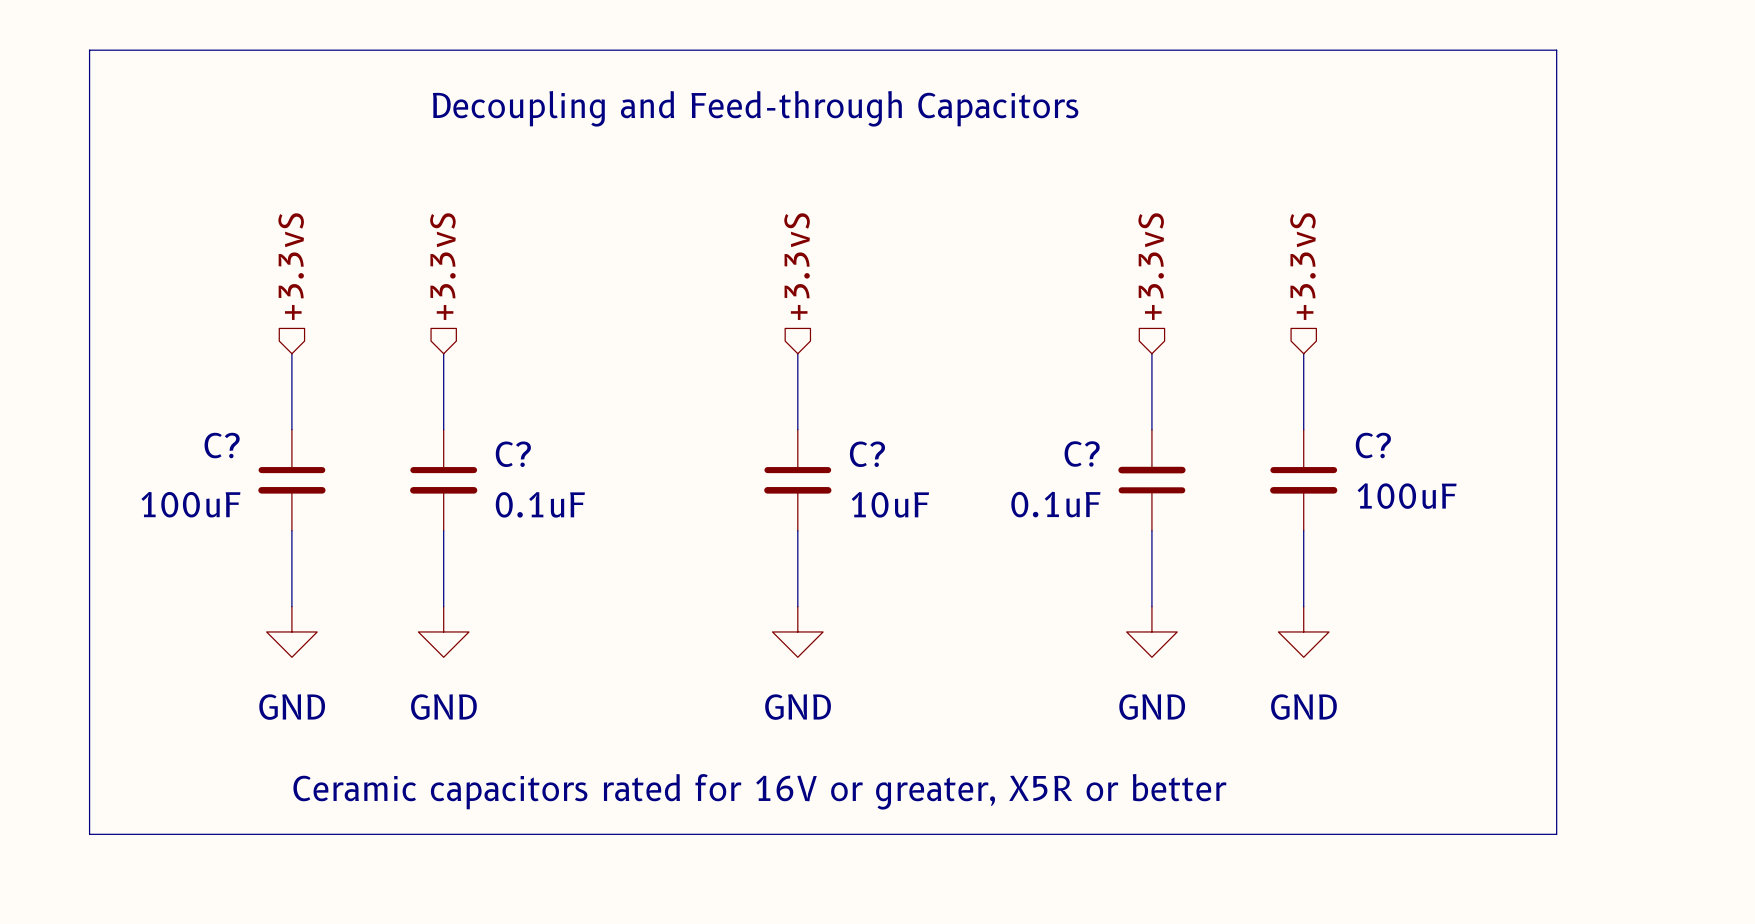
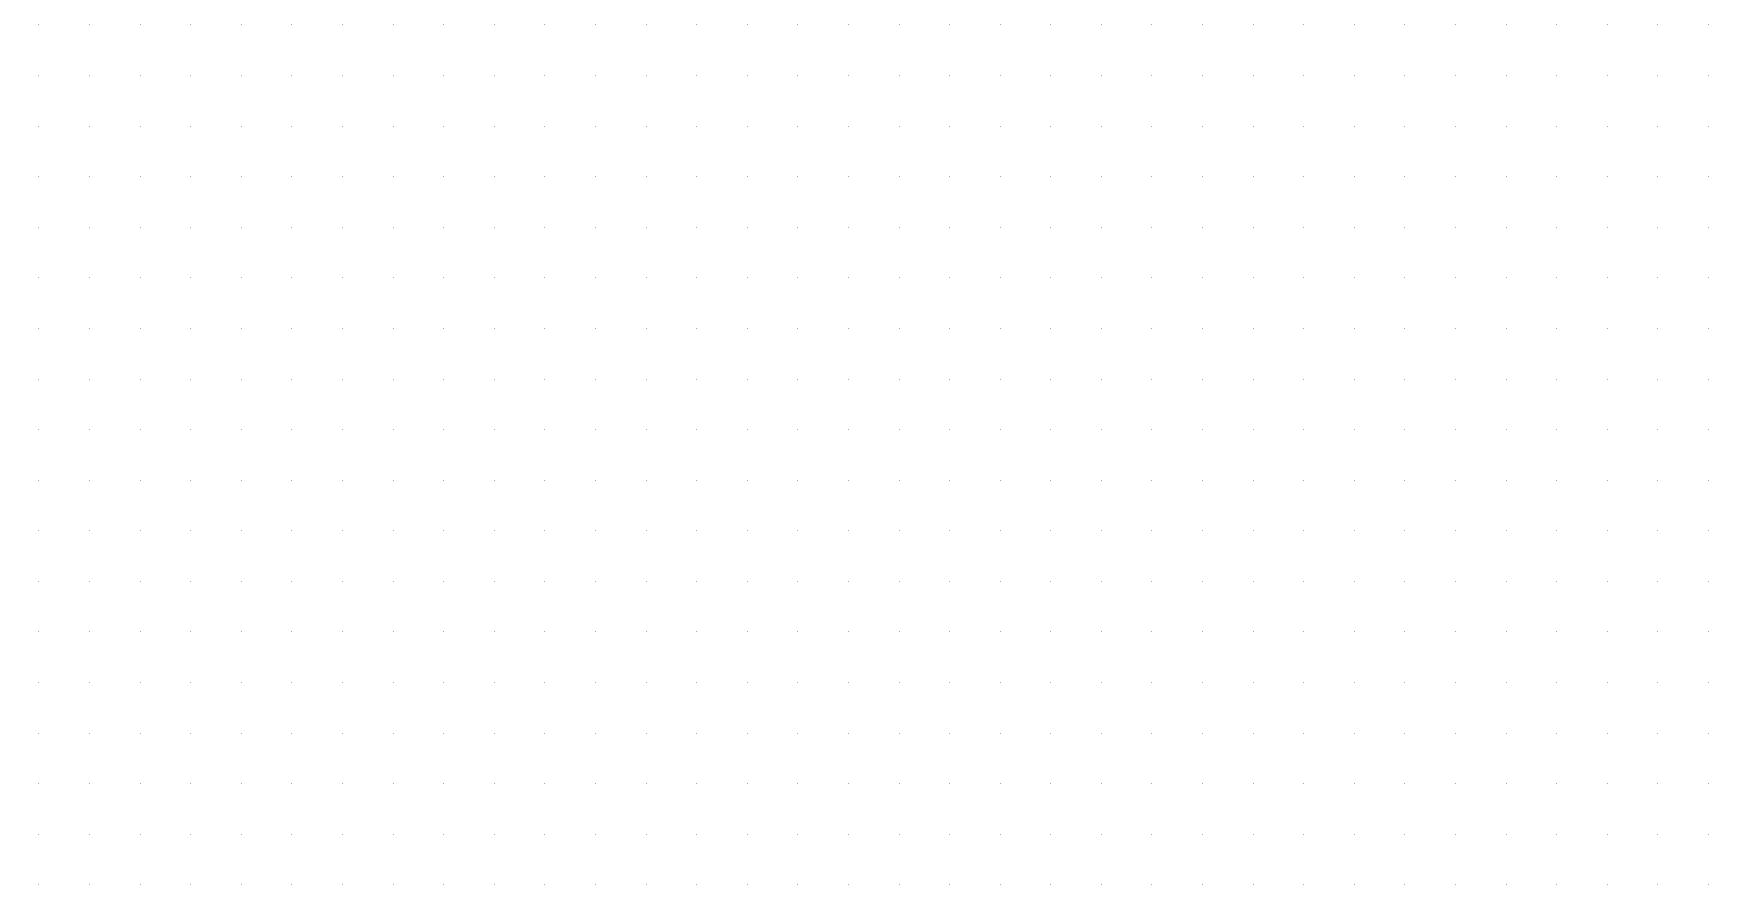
line: (89, 50) (1556, 50) (1556, 834) (89, 834) (89, 50) -> none
text: Decoupling and Feed-through Capacitors (755, 108) -> none
hierarchical label: +3.3vS (291, 266) -> none
hierarchical label: +3.3vS (442, 266) -> none
hierarchical label: +3.3vS (797, 266) -> none
hierarchical label: +3.3vS (1151, 266) -> none
hierarchical label: +3.3vS (1302, 266) -> none
wire: (291, 353) (291, 429) -> none
wire: (443, 353) (443, 429) -> none
wire: (797, 353) (797, 429) -> none
wire: (1151, 353) (1151, 429) -> none
wire: (1303, 353) (1303, 429) -> none
C?: 100uF (291, 480) -> none
C?: 0.1uF (443, 480) -> none
C?: 10uF (797, 480) -> none
C?: 0.1uF (1151, 480) -> none
C?: 100uF (1303, 480) -> none
wire: (291, 530) (291, 606) -> none
wire: (443, 530) (443, 606) -> none
wire: (797, 530) (797, 606) -> none
wire: (1151, 530) (1151, 606) -> none
wire: (1303, 530) (1303, 606) -> none
power symbol: GND (291, 631) -> none
power symbol: GND (443, 631) -> none
power symbol: GND (797, 631) -> none
power symbol: GND (1151, 631) -> none
power symbol: GND (1303, 631) -> none
text: Ceramic capacitors rated for 16V or greater, X5R or better (759, 791) -> none

